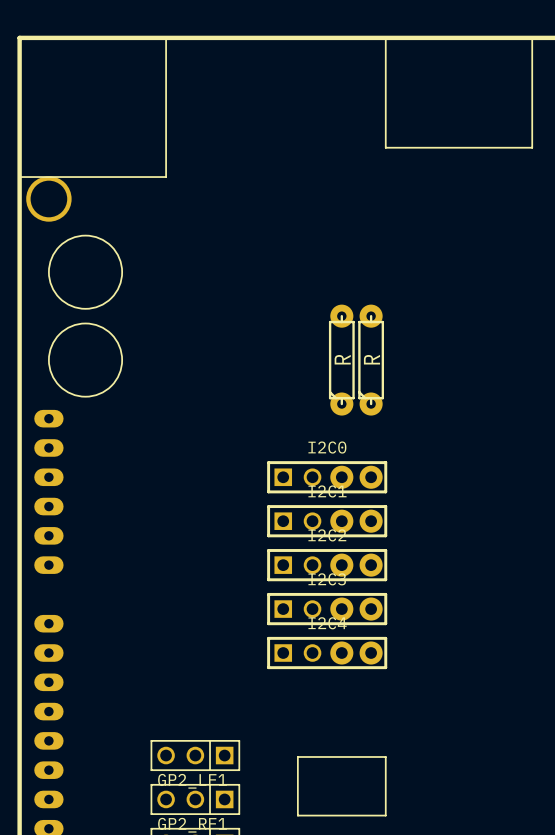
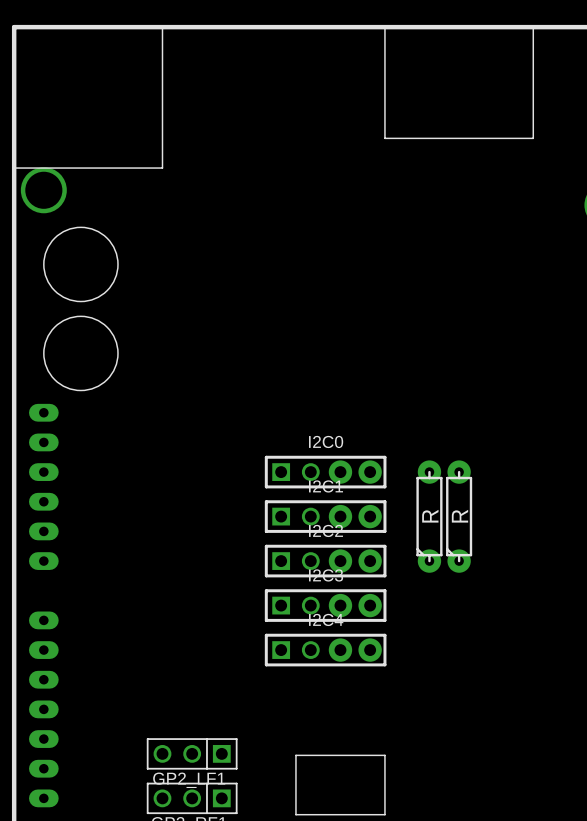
part: R (341, 360) -> none
part: R (371, 360) -> none
part: none -> R (429, 516)
part: none -> R (459, 516)

